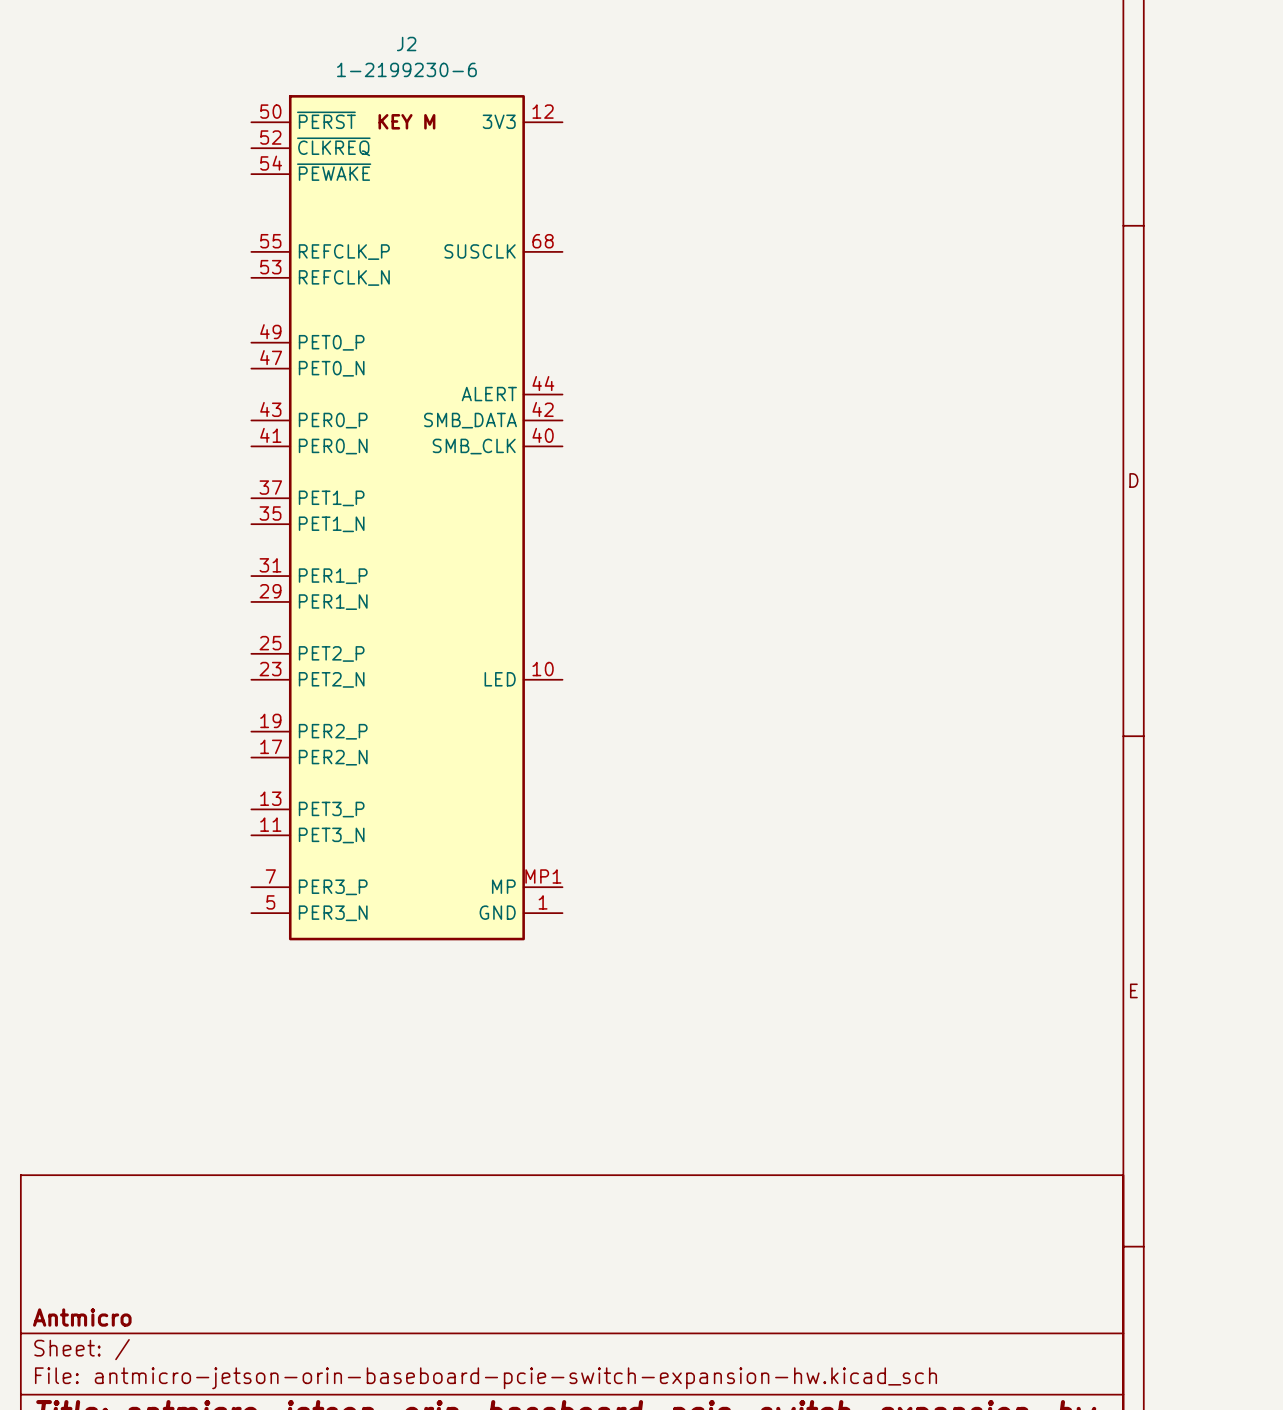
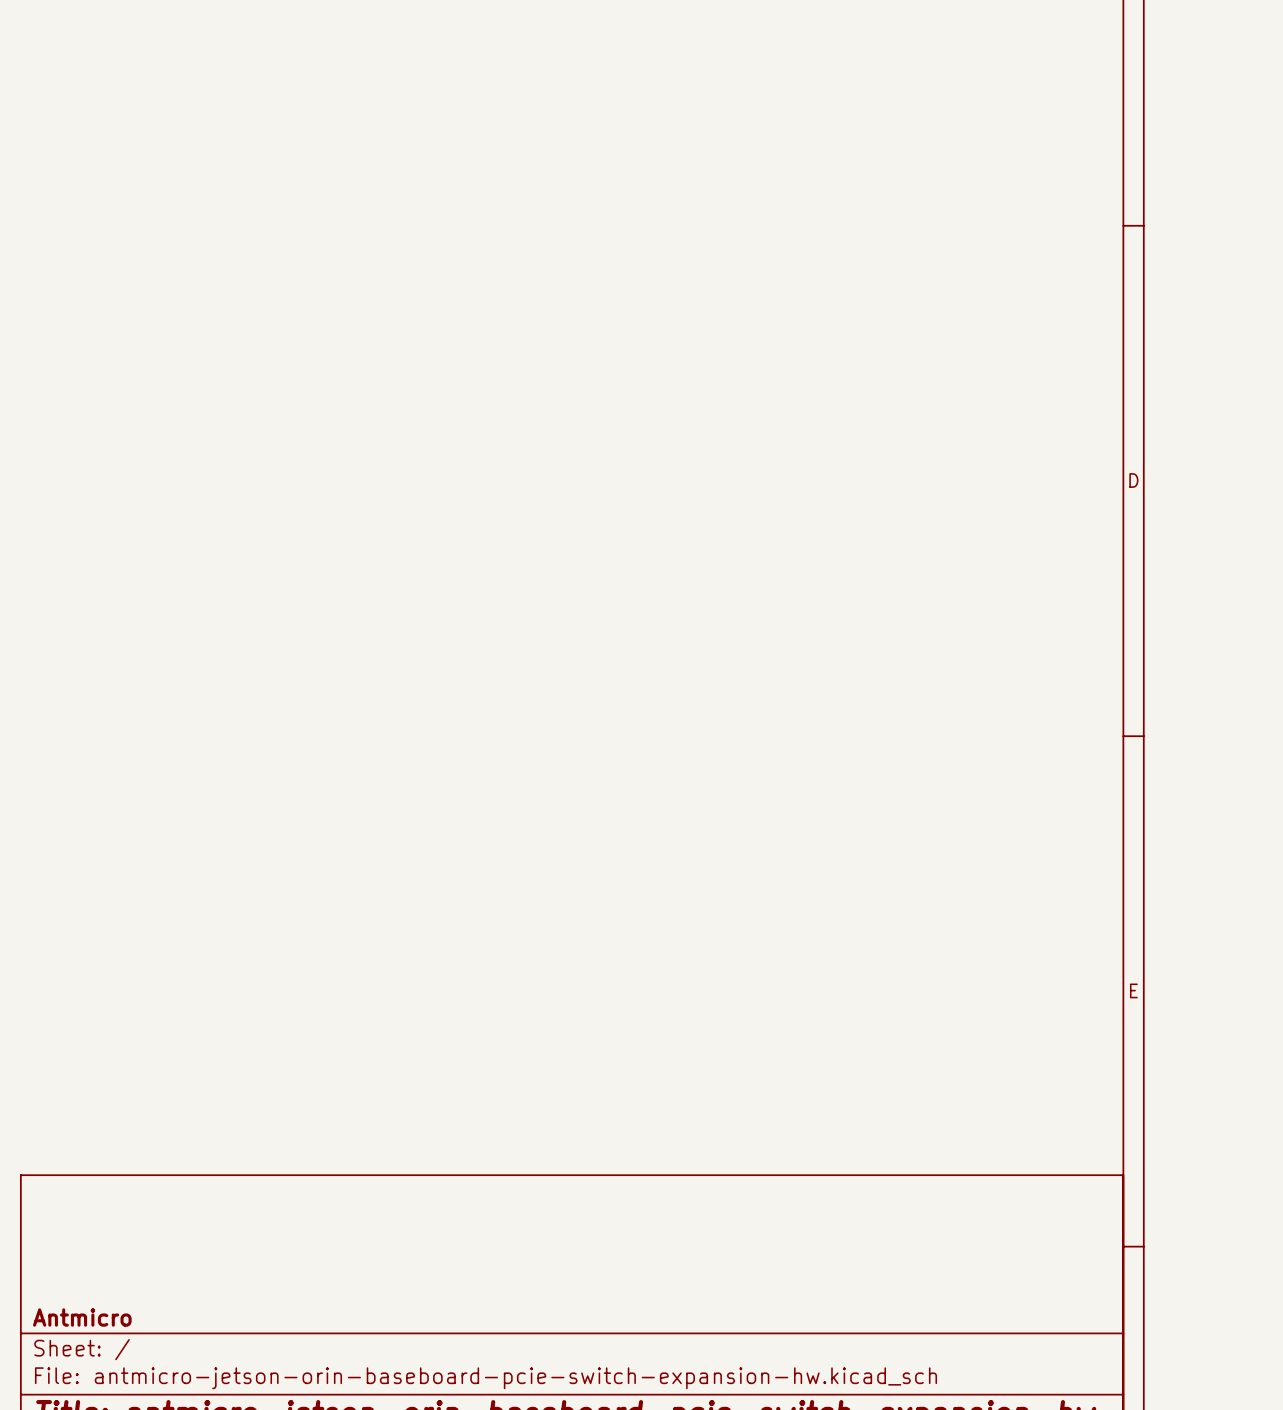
J2: (406, 517) -> none

